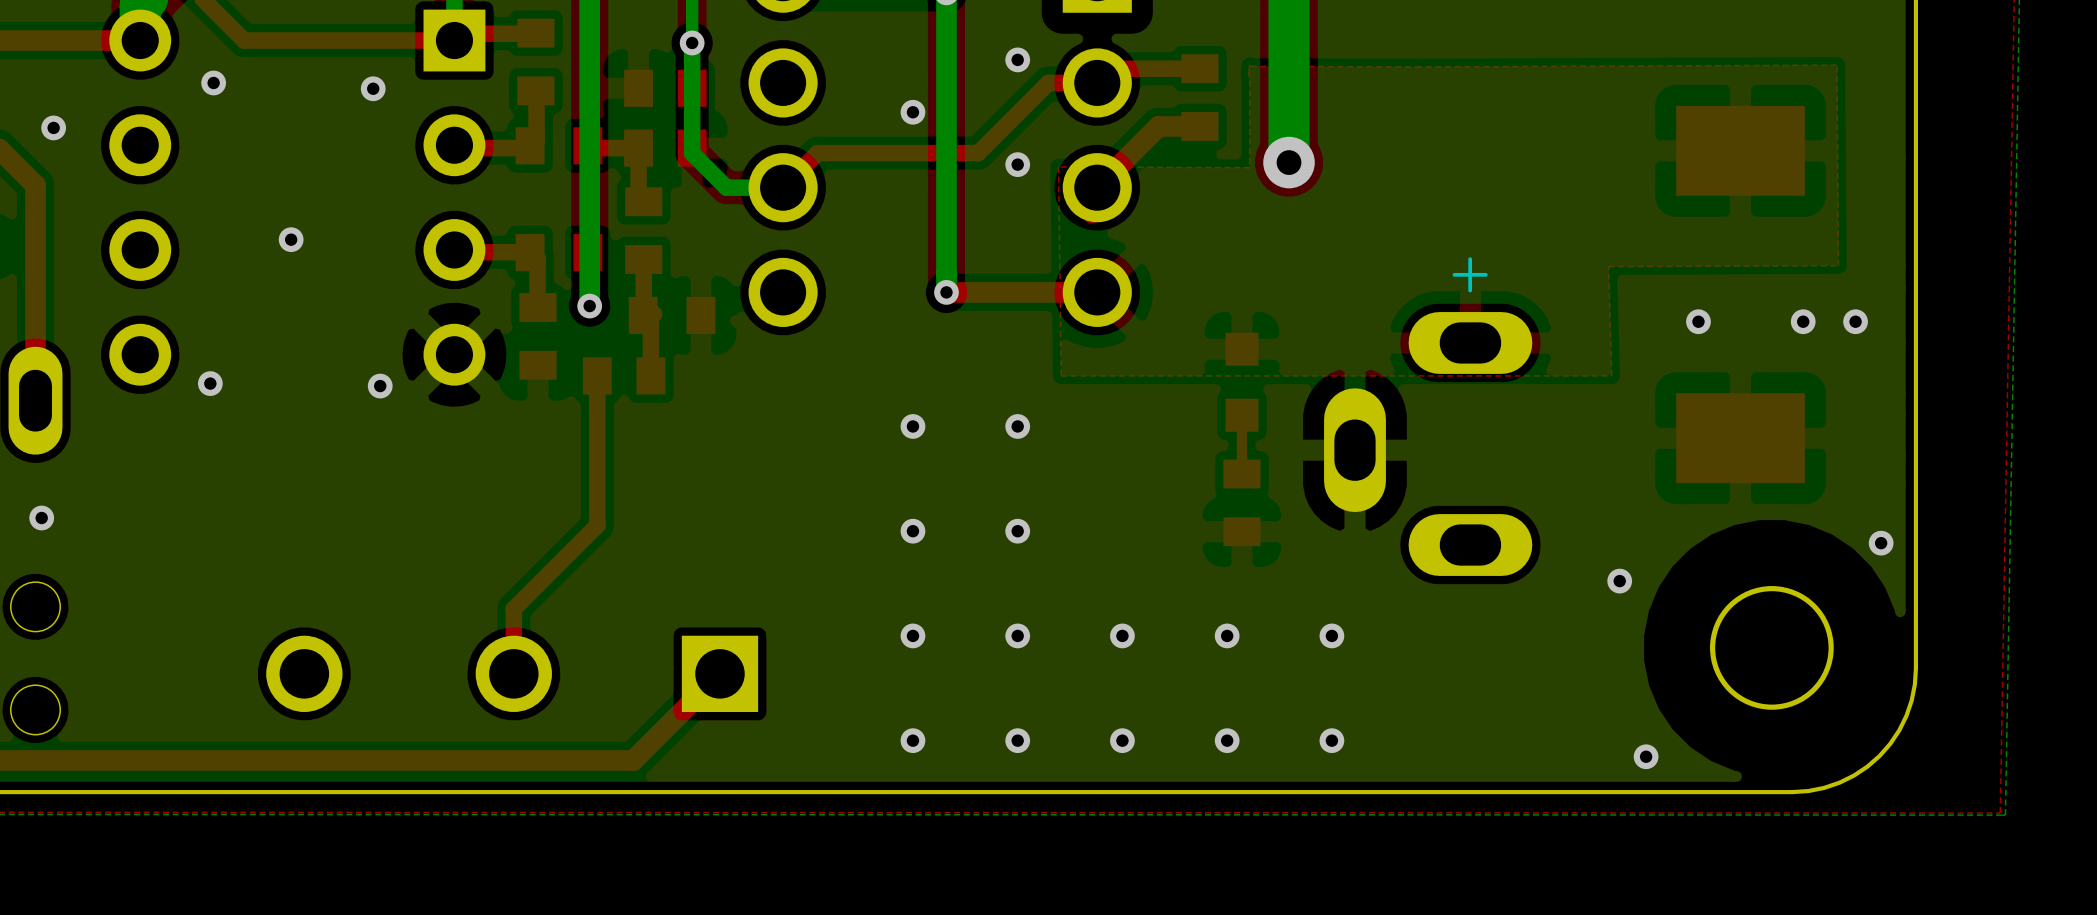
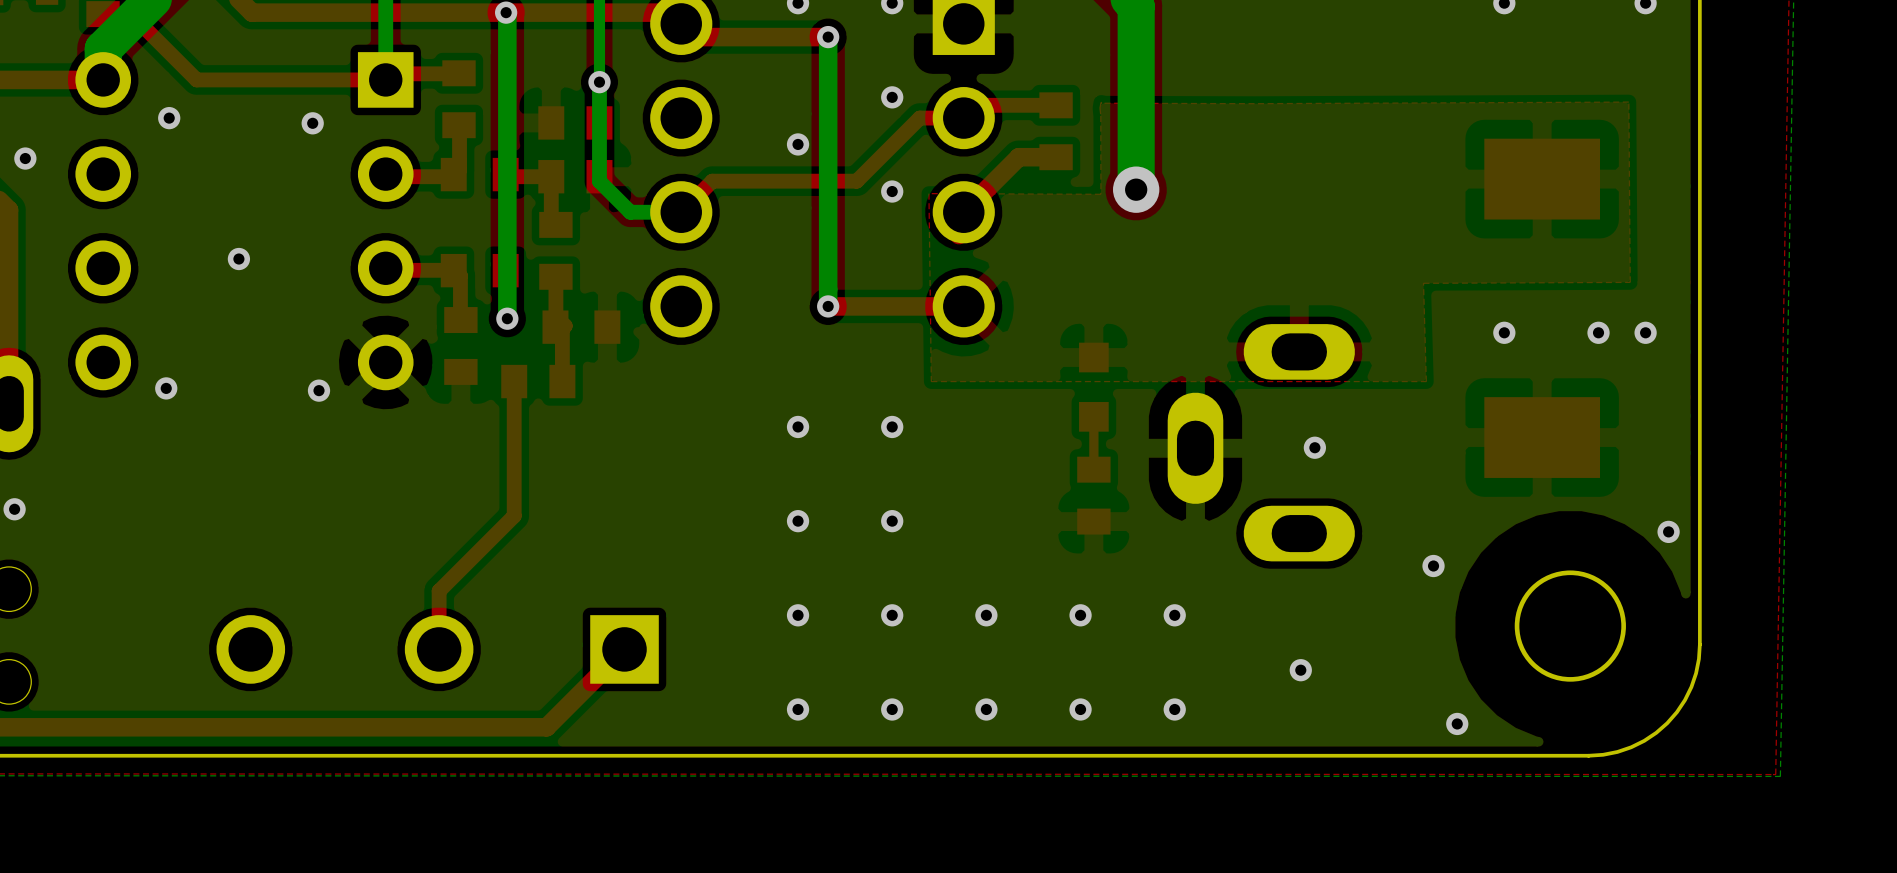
text: + (1470, 274) -> none
via: none -> (1314, 447)
via: none -> (1300, 670)

